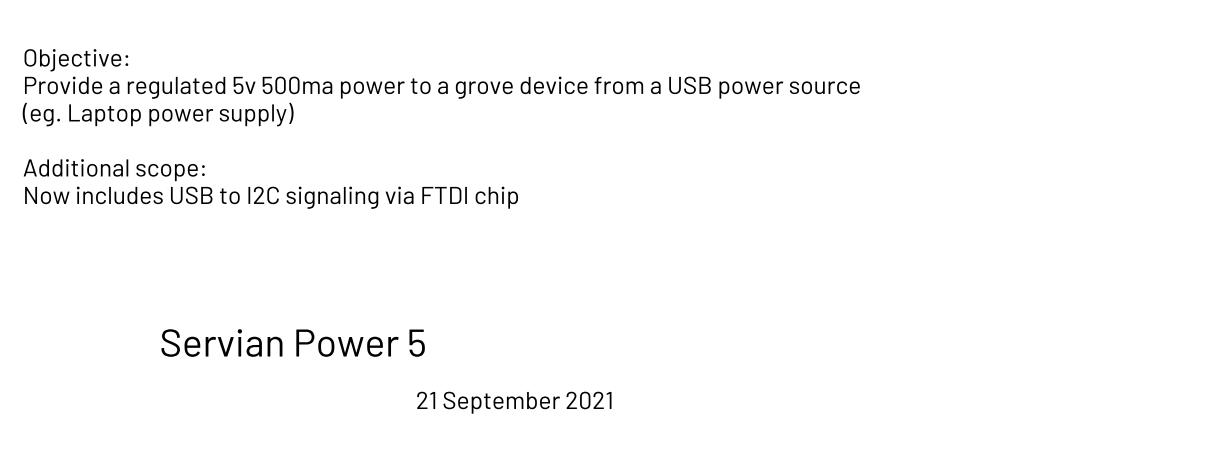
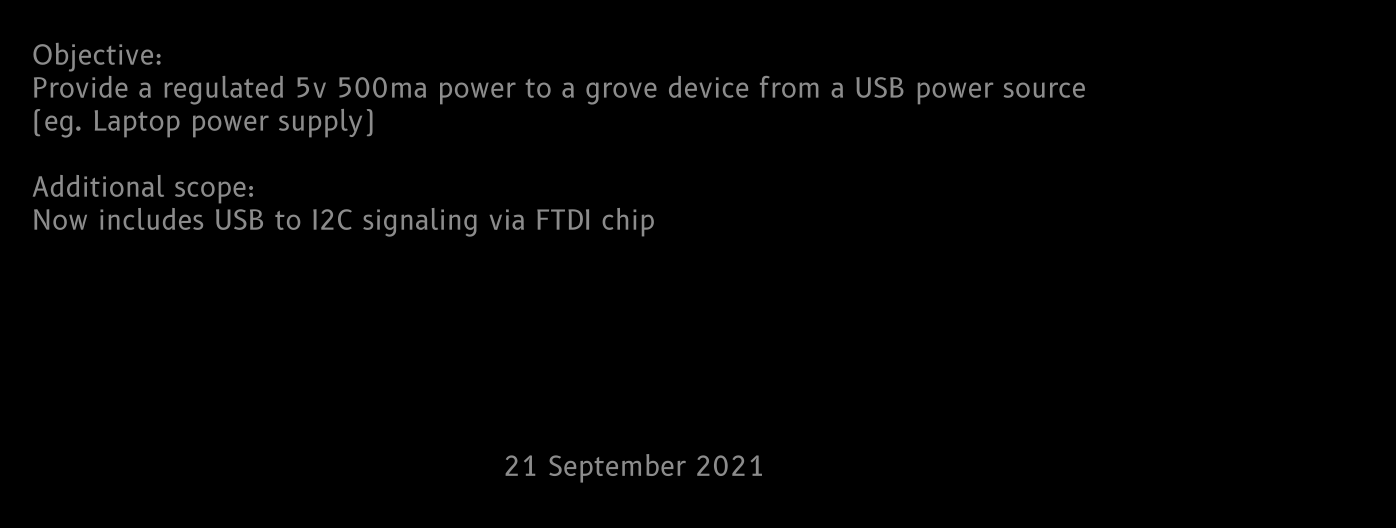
text: Servian Power 5 (293, 343) -> none

